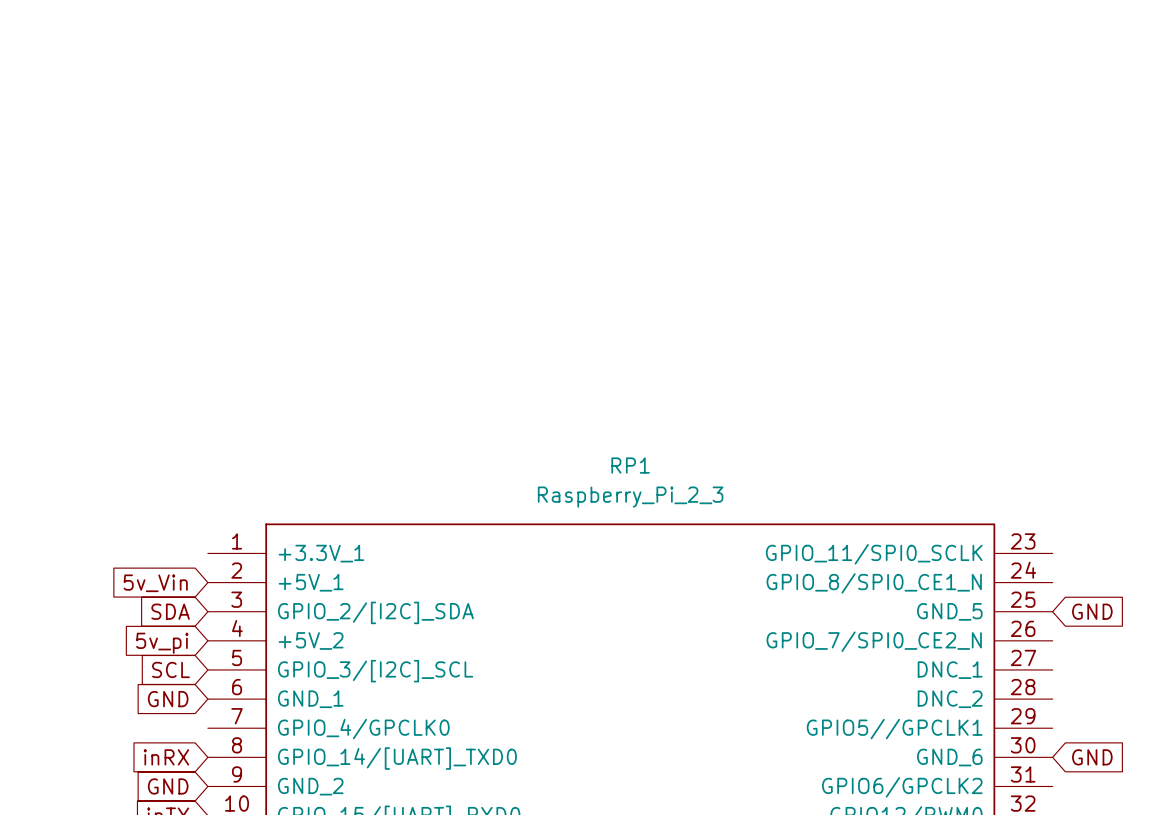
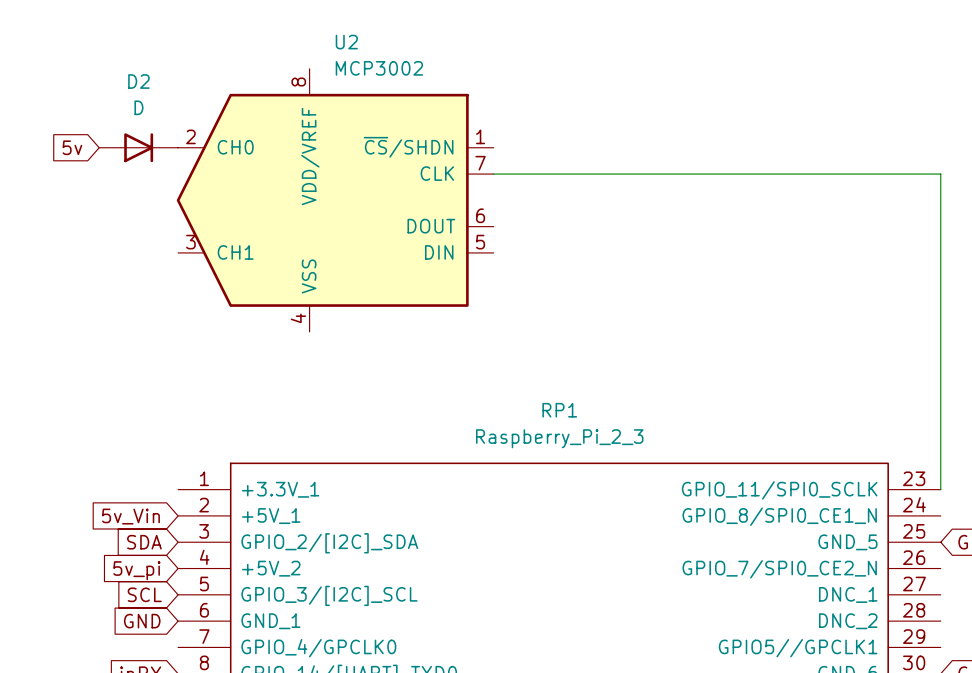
global label: none -> 5v (72, 147)
D2: none -> D (138, 147)
wire: none -> (493, 174) (940, 174) (940, 489)
U2: none -> MCP3002 (335, 200)

